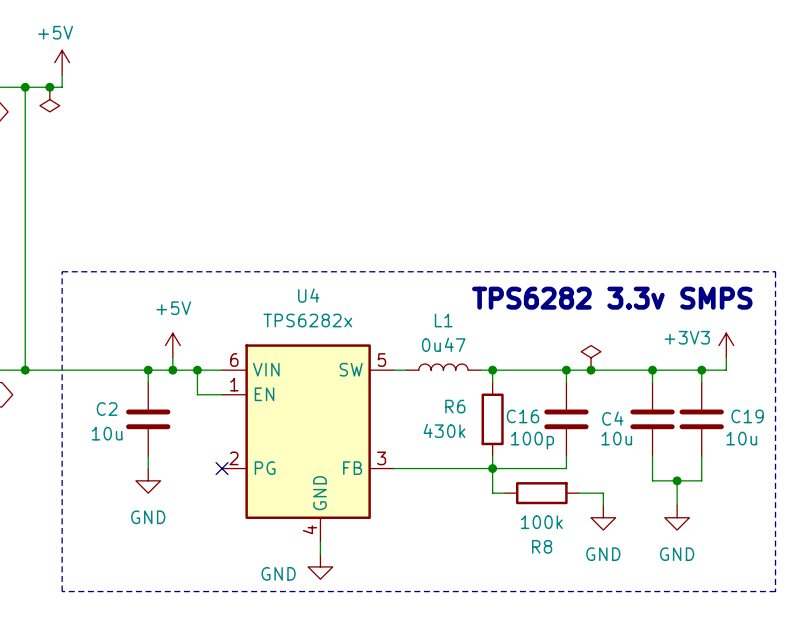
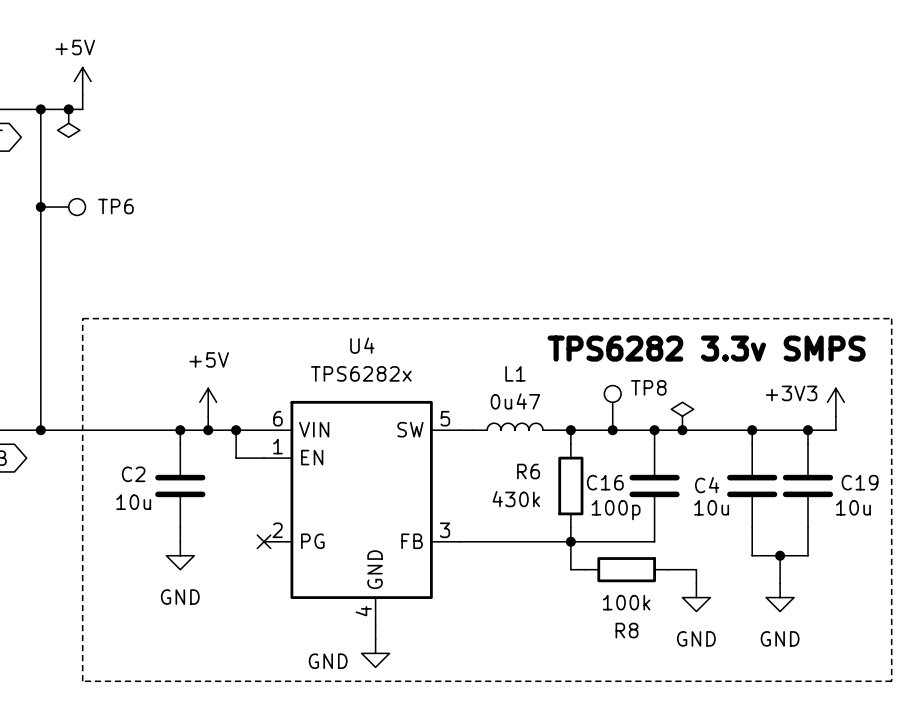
junction: none -> (40, 207)
TP6: none -> (63, 207)
TP8: none -> (612, 407)
junction: none -> (612, 430)

